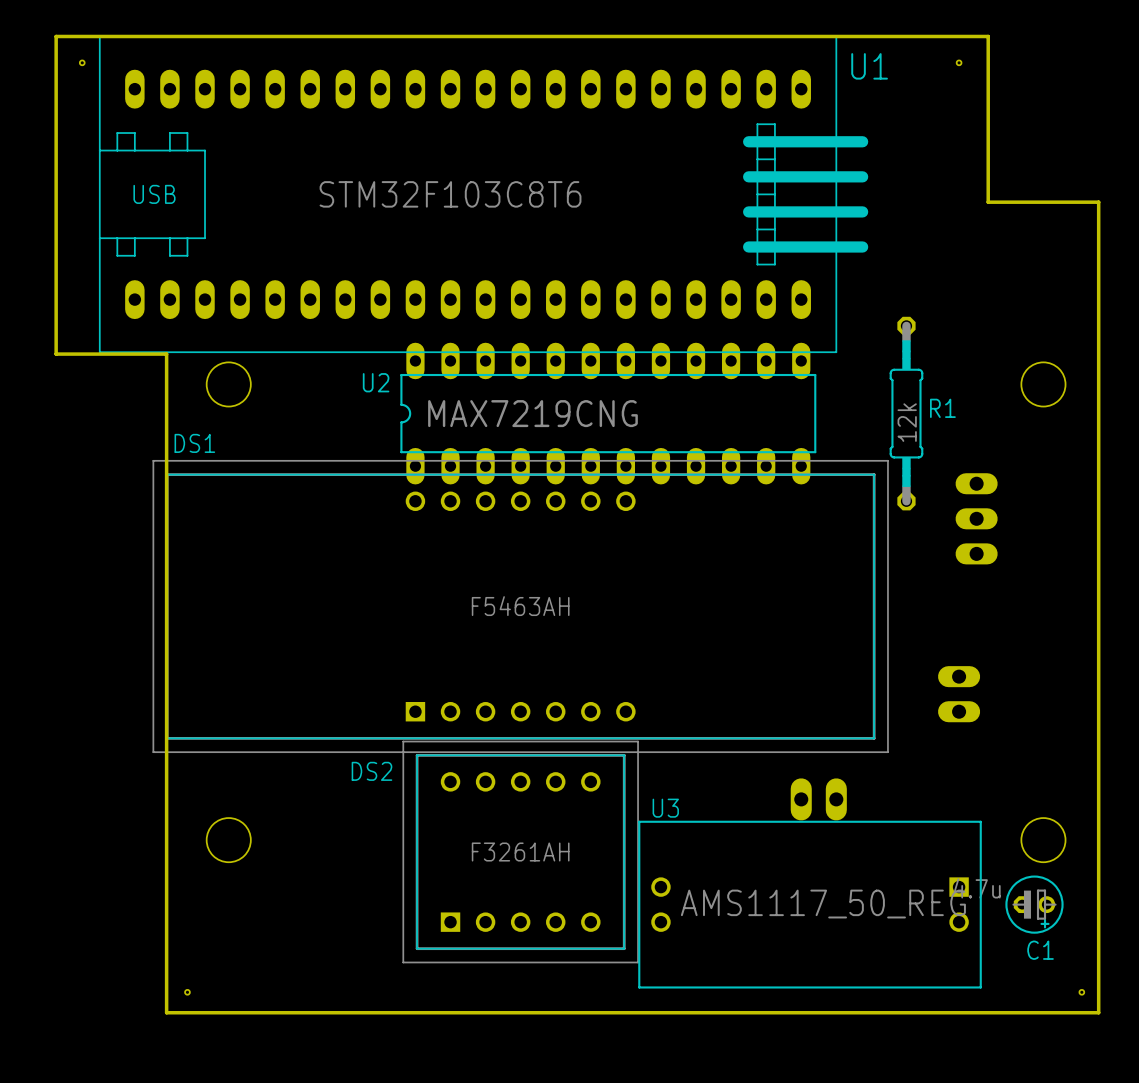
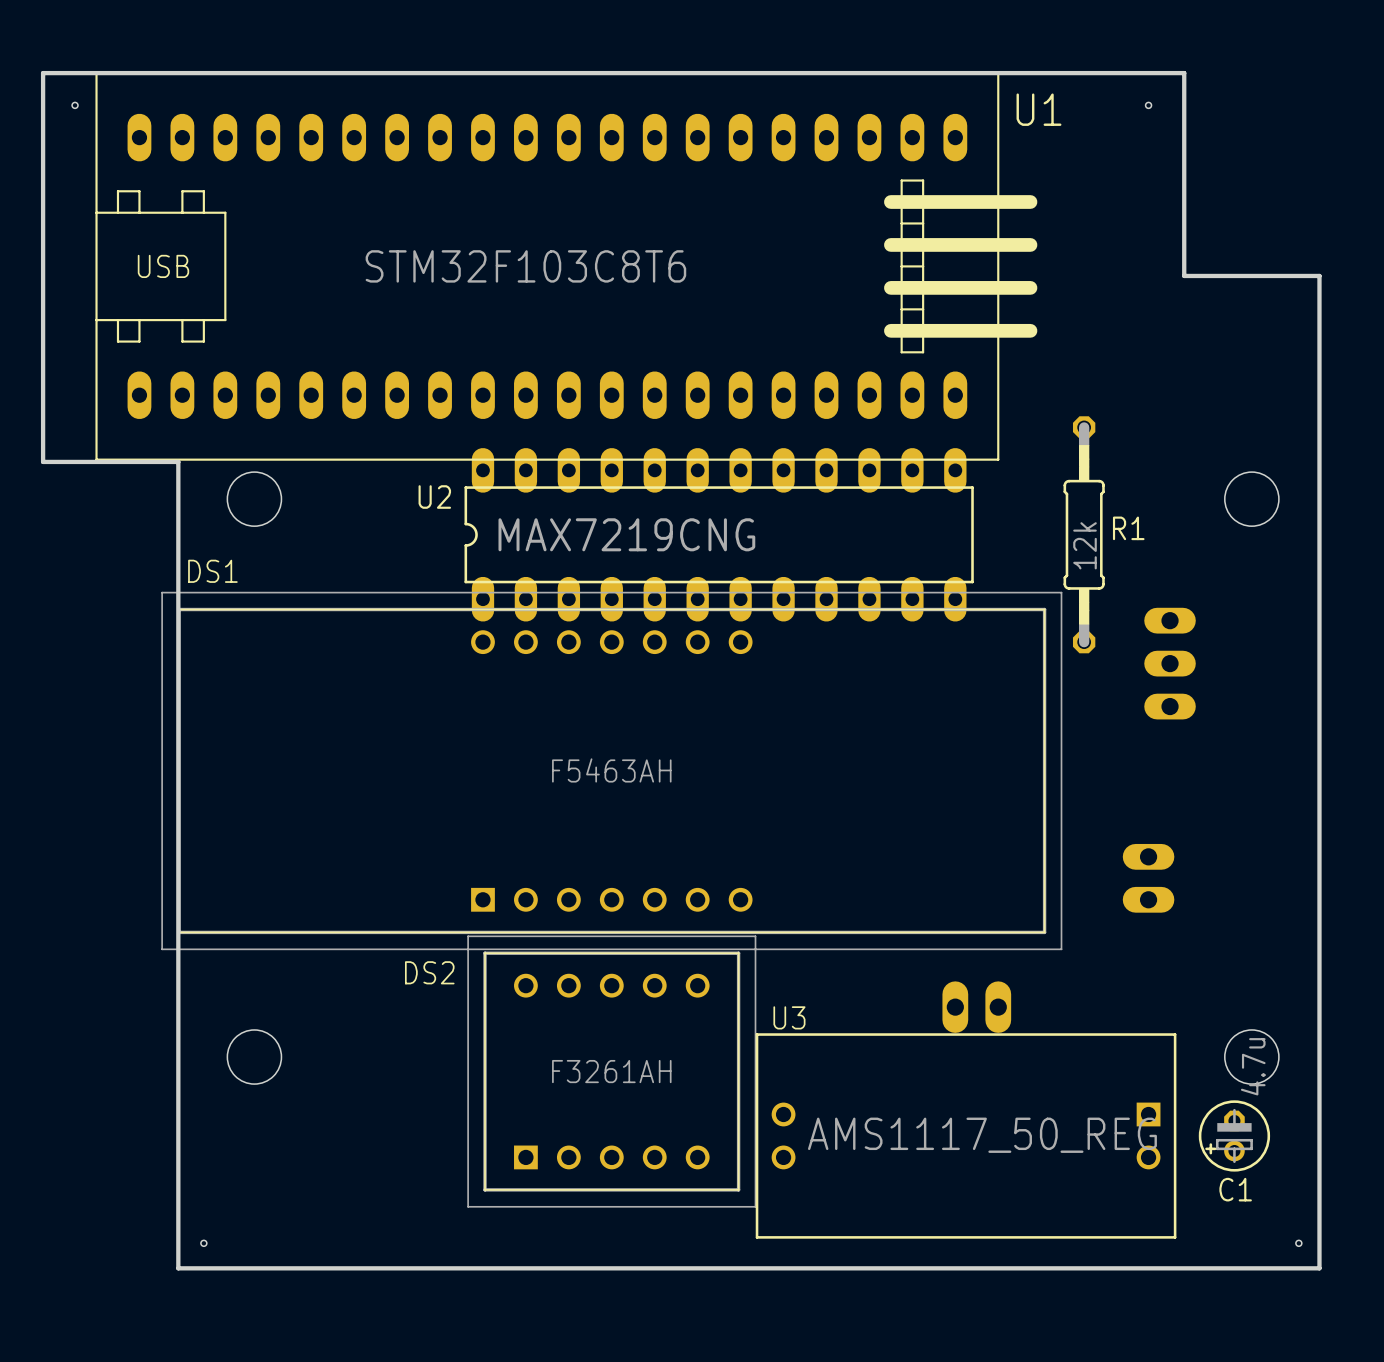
C1 rotation: 0° (1034, 904) -> 90° clockwise (1234, 1135)

